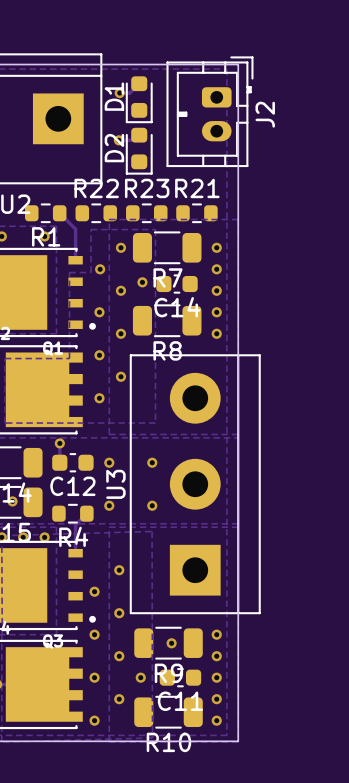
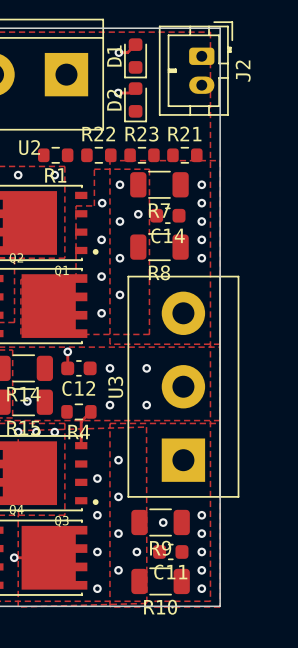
track: (59, 213) (75, 229) (75, 260) -> none

